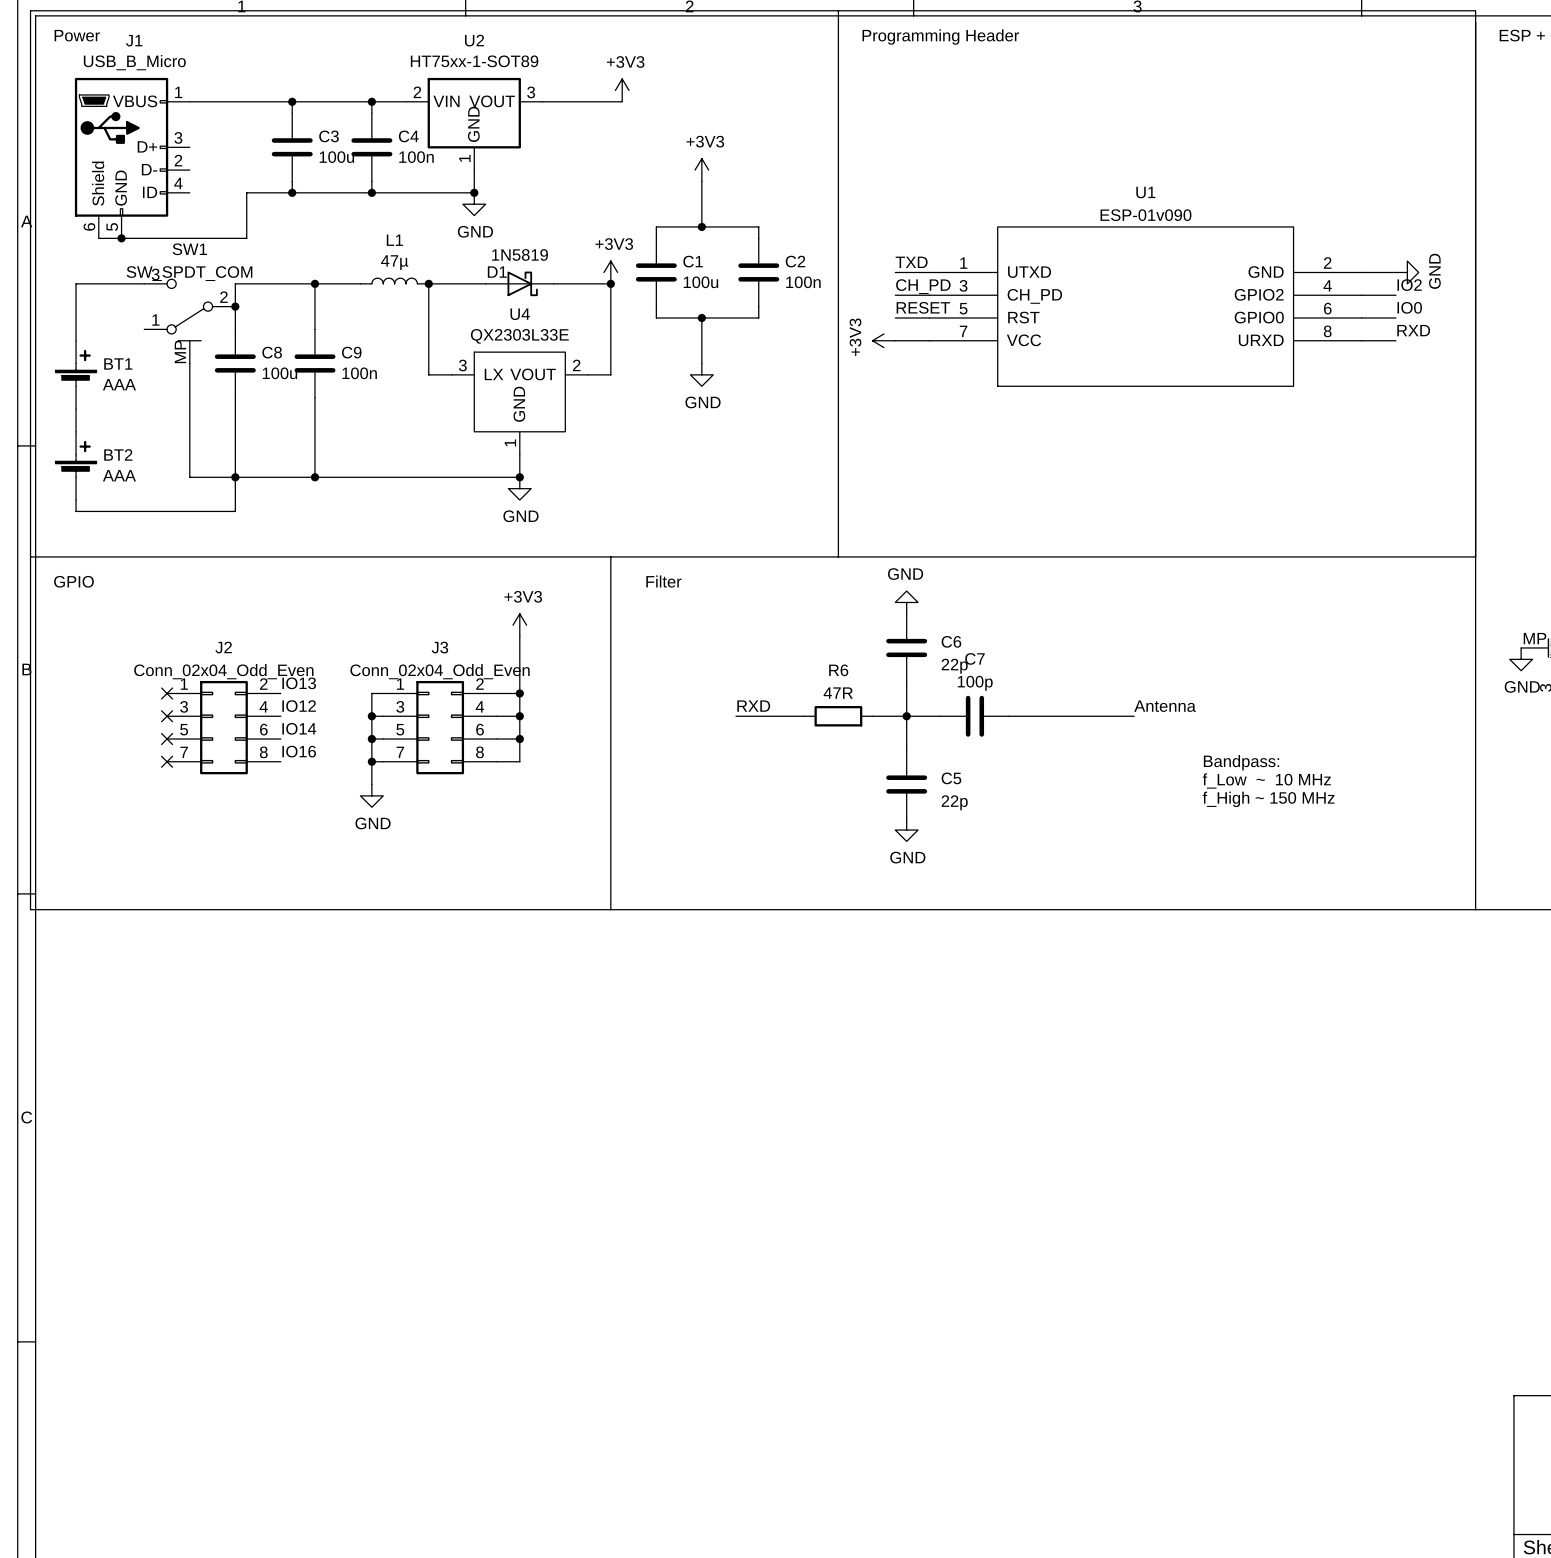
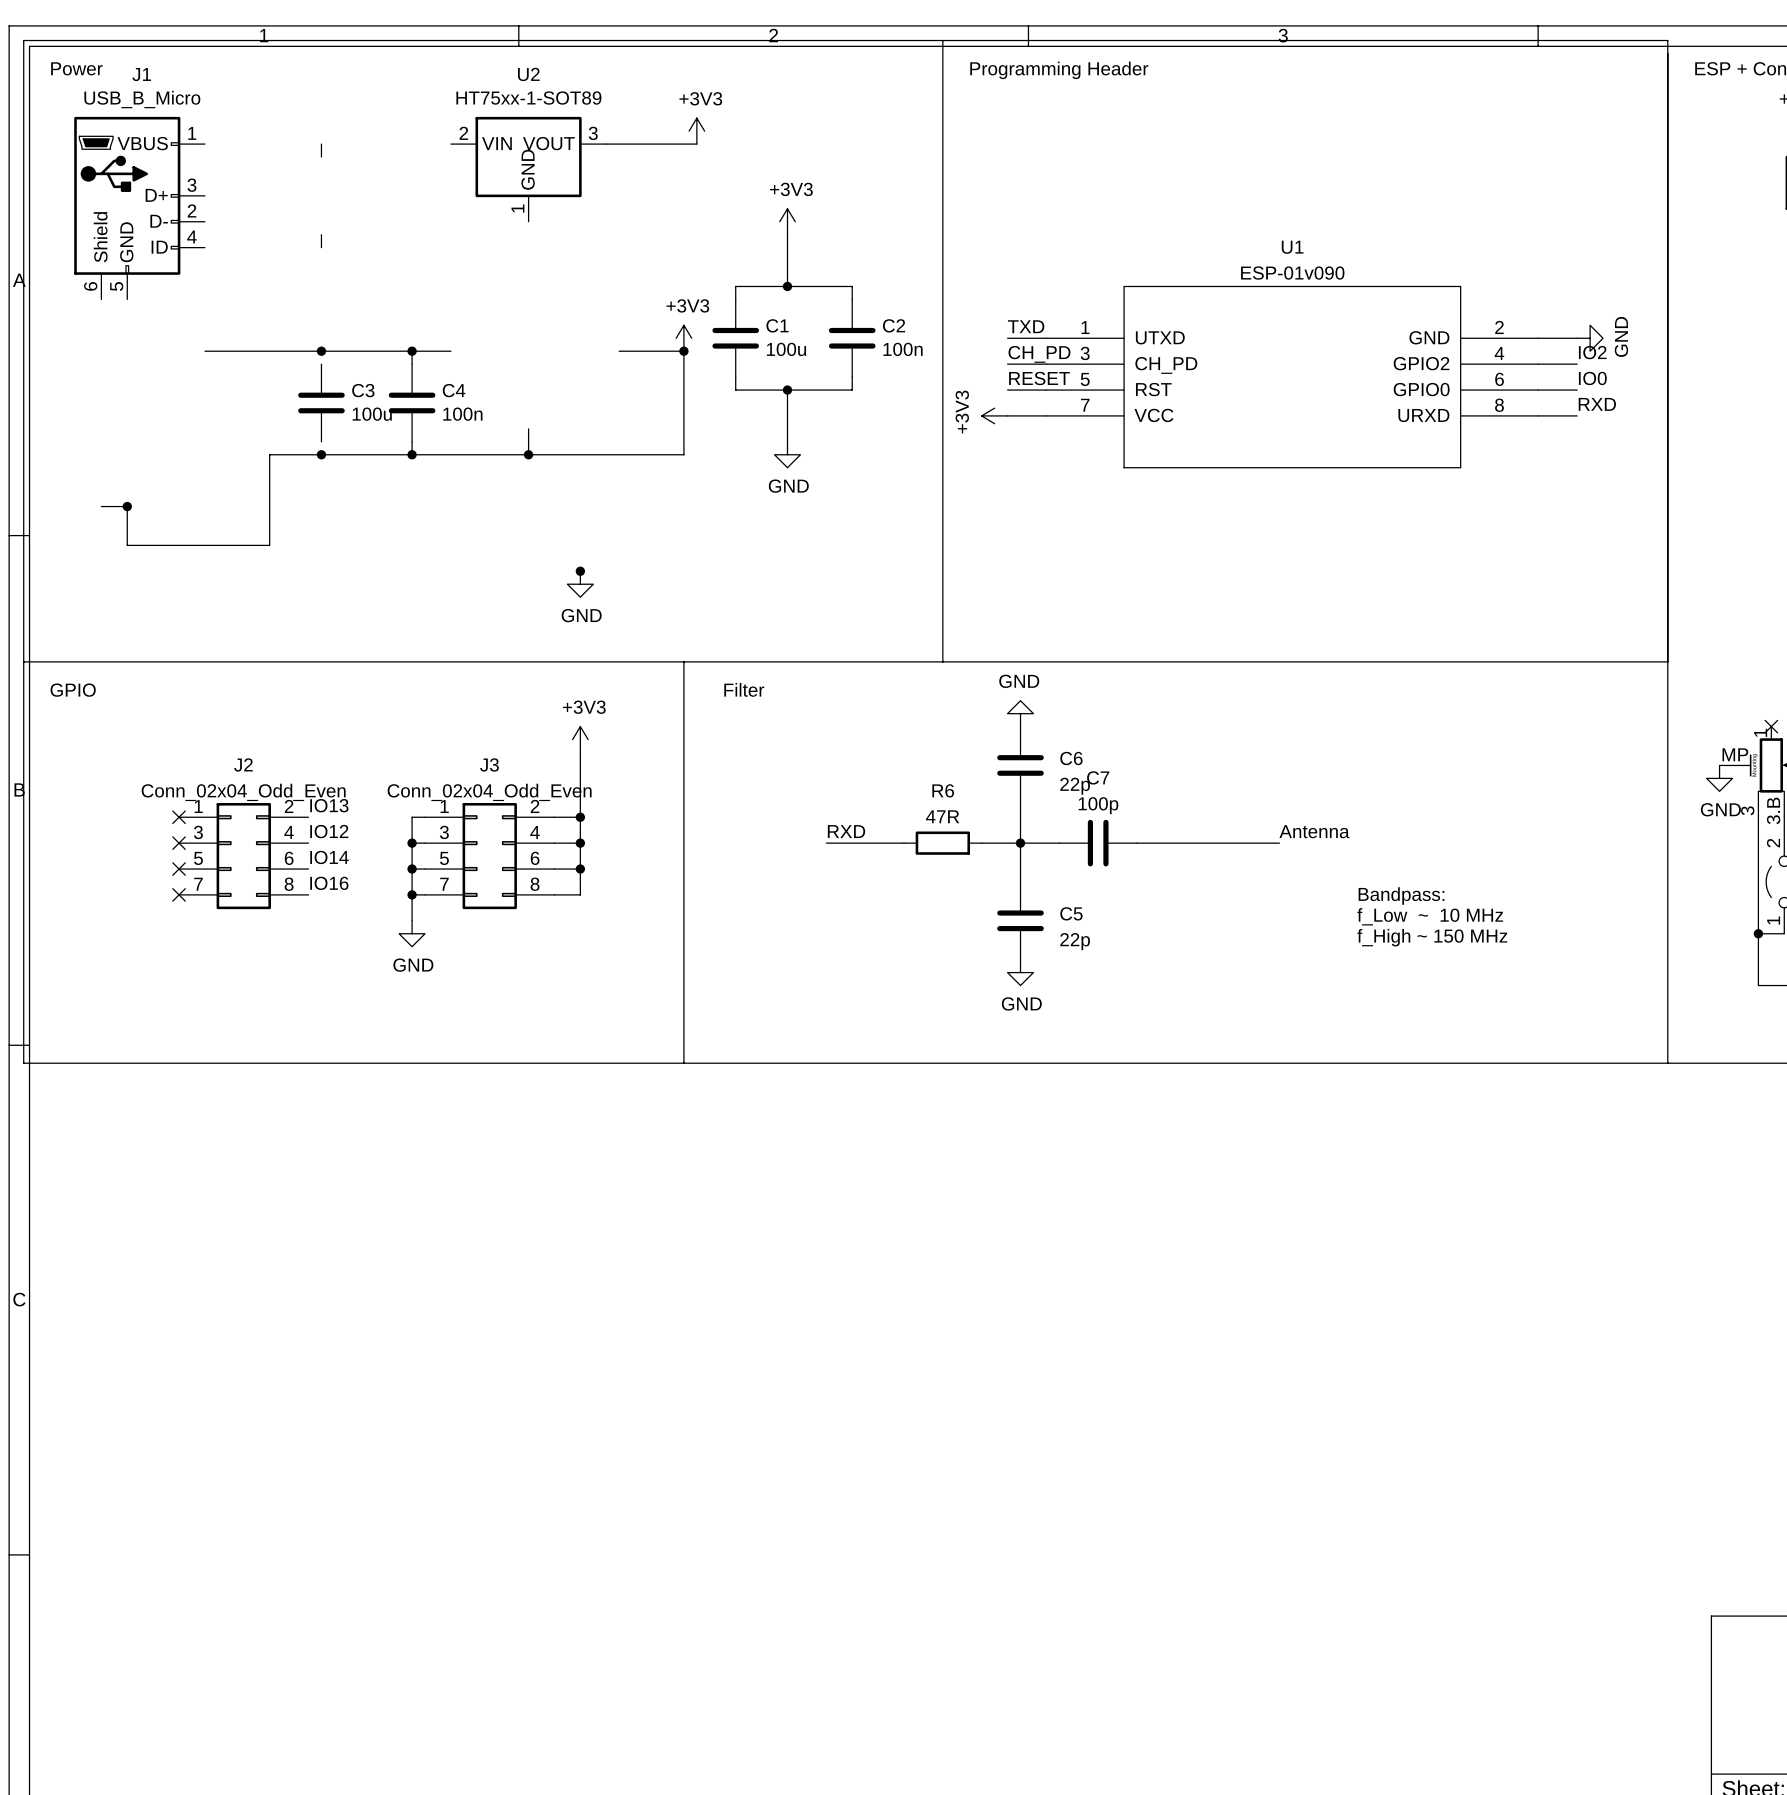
wire: (189, 101) (406, 101) -> none
junction: (292, 101) -> none
wire: (371, 101) (371, 113) -> (412, 351) (412, 364)
junction: (371, 101) -> none
C3 position: (292, 147) -> (321, 402)
C4 position: (371, 147) -> (412, 402)
wire: (474, 170) (474, 192) (246, 192) (246, 238) (98, 238) -> none
wire: (371, 181) (371, 192) -> (412, 441) (412, 454)
junction: (292, 192) -> none
junction: (371, 192) -> none
junction: (474, 192) -> none
power symbol: GND (474, 204) -> none
junction: (121, 238) -> none
L1: 47µ (394, 281) -> none
wire: (144, 283) (76, 283) (76, 340) -> none
wire: (235, 283) (235, 329) -> (256, 351) (204, 351)
wire: (314, 283) (314, 329) -> none
junction position: (314, 283) -> (321, 351)
wire: none -> (399, 351) (450, 351)
junction: none -> (412, 351)
junction: (428, 283) -> none
wire: (485, 283) (428, 283) (428, 374) -> (101, 506) (127, 506) (127, 545) (269, 545) (269, 454) (476, 454)
D1: 1N5819 (519, 283) -> none
junction: (235, 306) -> none
SW1: SW_SPDT_COM (189, 321) -> none
wire: (189, 363) (189, 477) (519, 477) (519, 454) -> none
C8: 100u (235, 363) -> none
C9: 100n (314, 363) -> none
BT1: AAA (76, 374) -> none
junction: none -> (321, 454)
junction: none -> (412, 454)
wire: none -> (502, 454) (658, 454)
junction: none -> (528, 454)
wire: (235, 397) (235, 511) (76, 511) (76, 500) -> none
wire: (314, 397) (314, 477) -> none
U4: QX2303L33E (519, 403) -> none
wire: (76, 409) (76, 431) -> none
junction: none -> (127, 506)
BT2: AAA (76, 465) -> none
junction: (235, 477) -> none
junction: (314, 477) -> none

